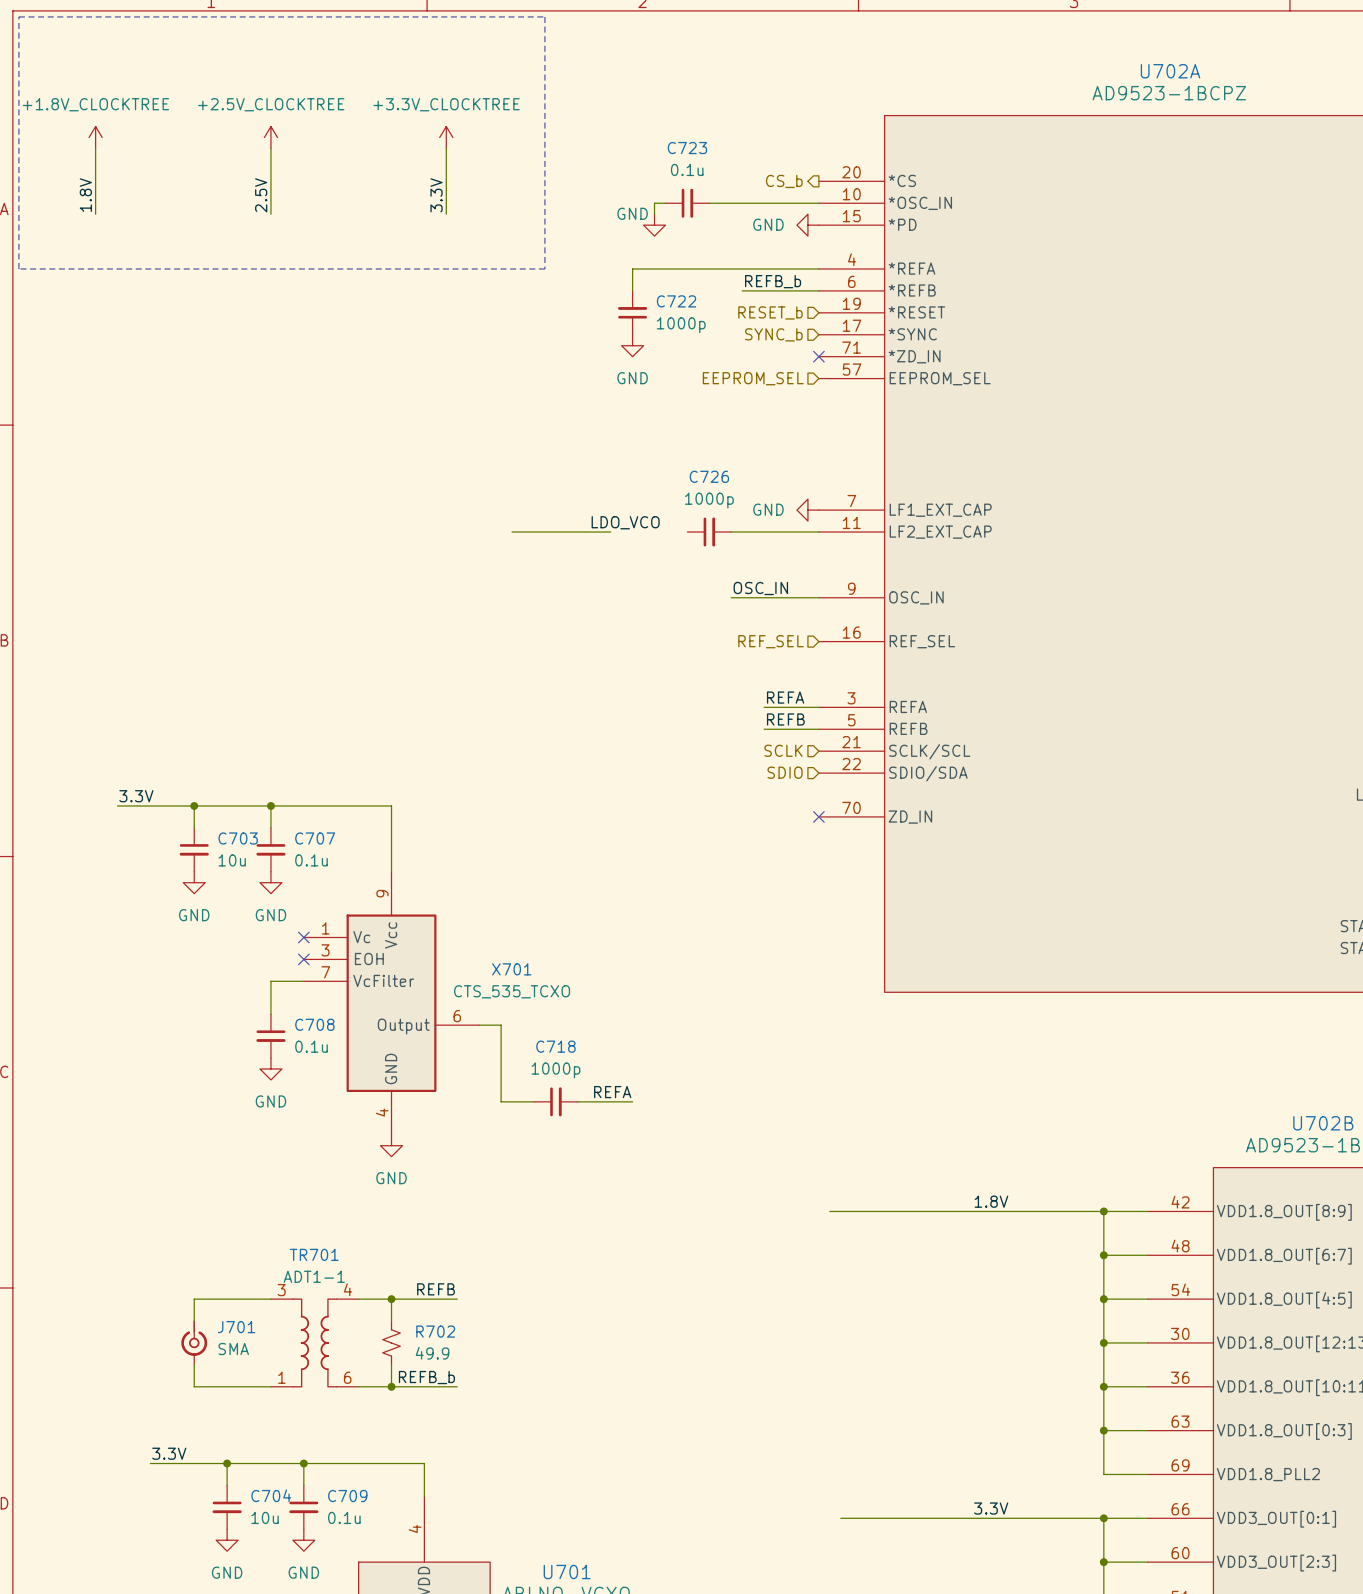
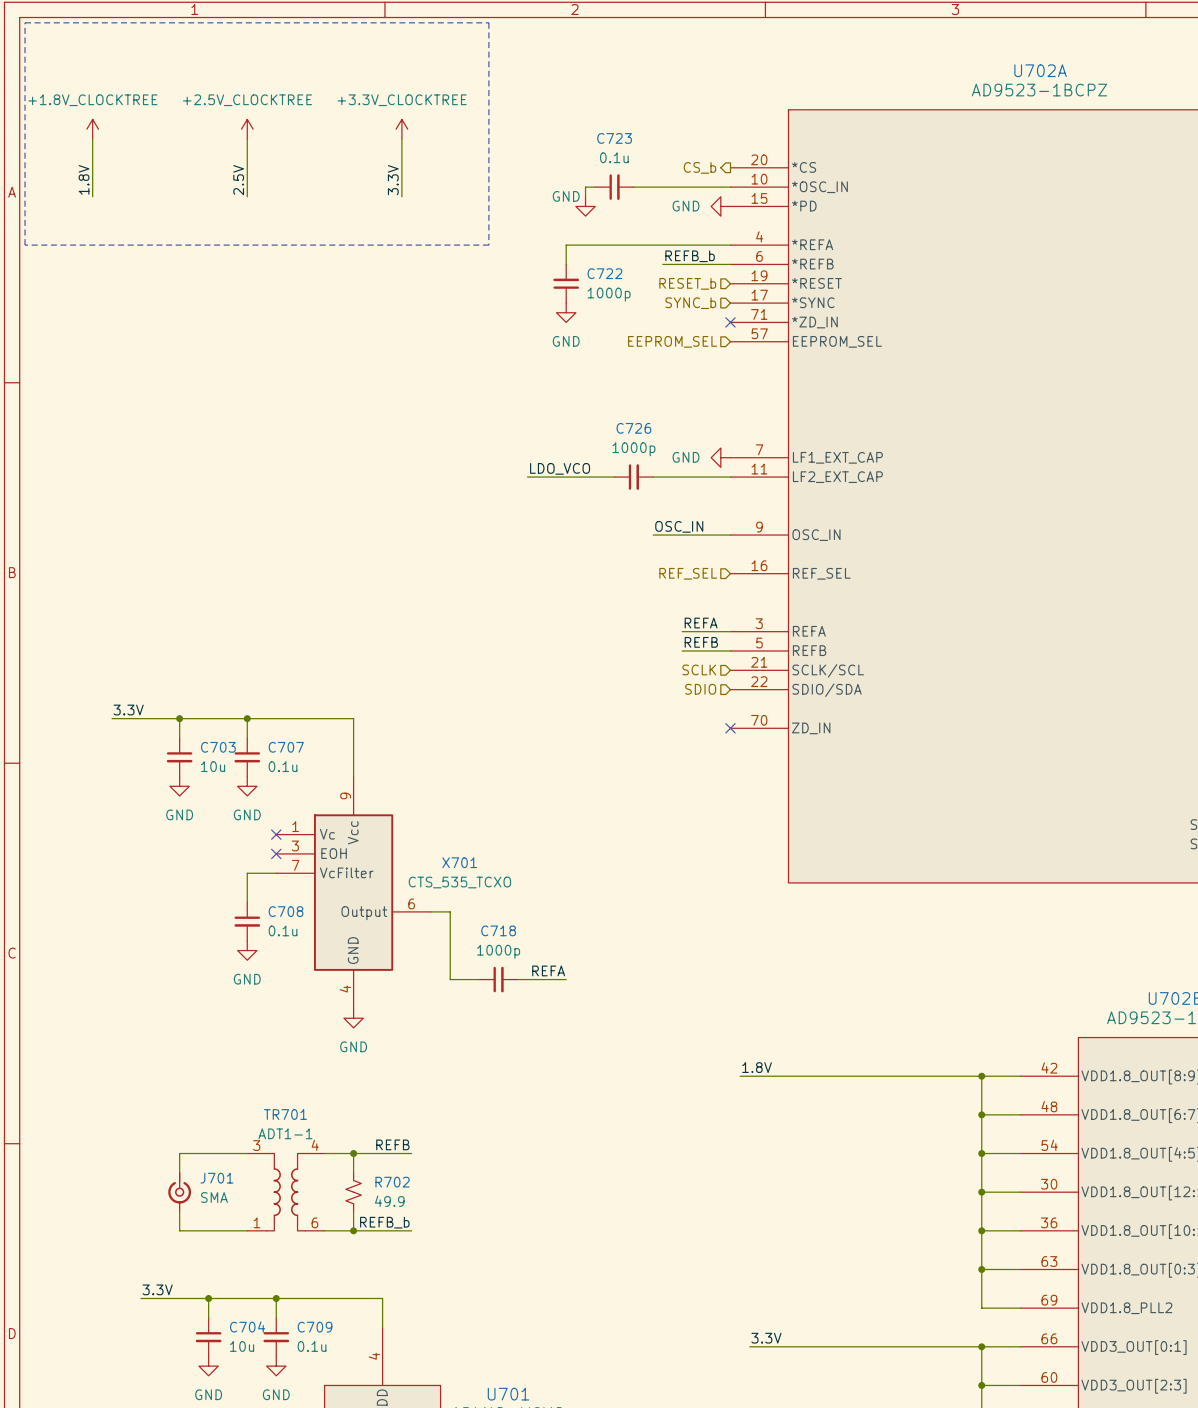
wire: (512, 532) (588, 532) -> (546, 477) (614, 477)
label position: 1.8V (991, 1201) -> 1.8V (757, 1067)
label position: 3.3V (991, 1508) -> 3.3V (766, 1338)

